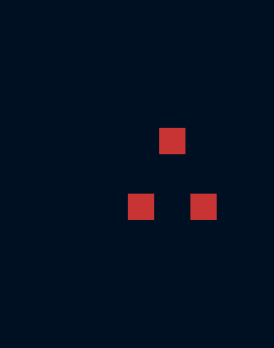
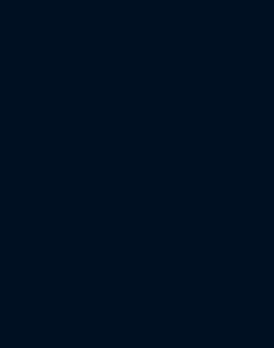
part: (172, 173) -> none

